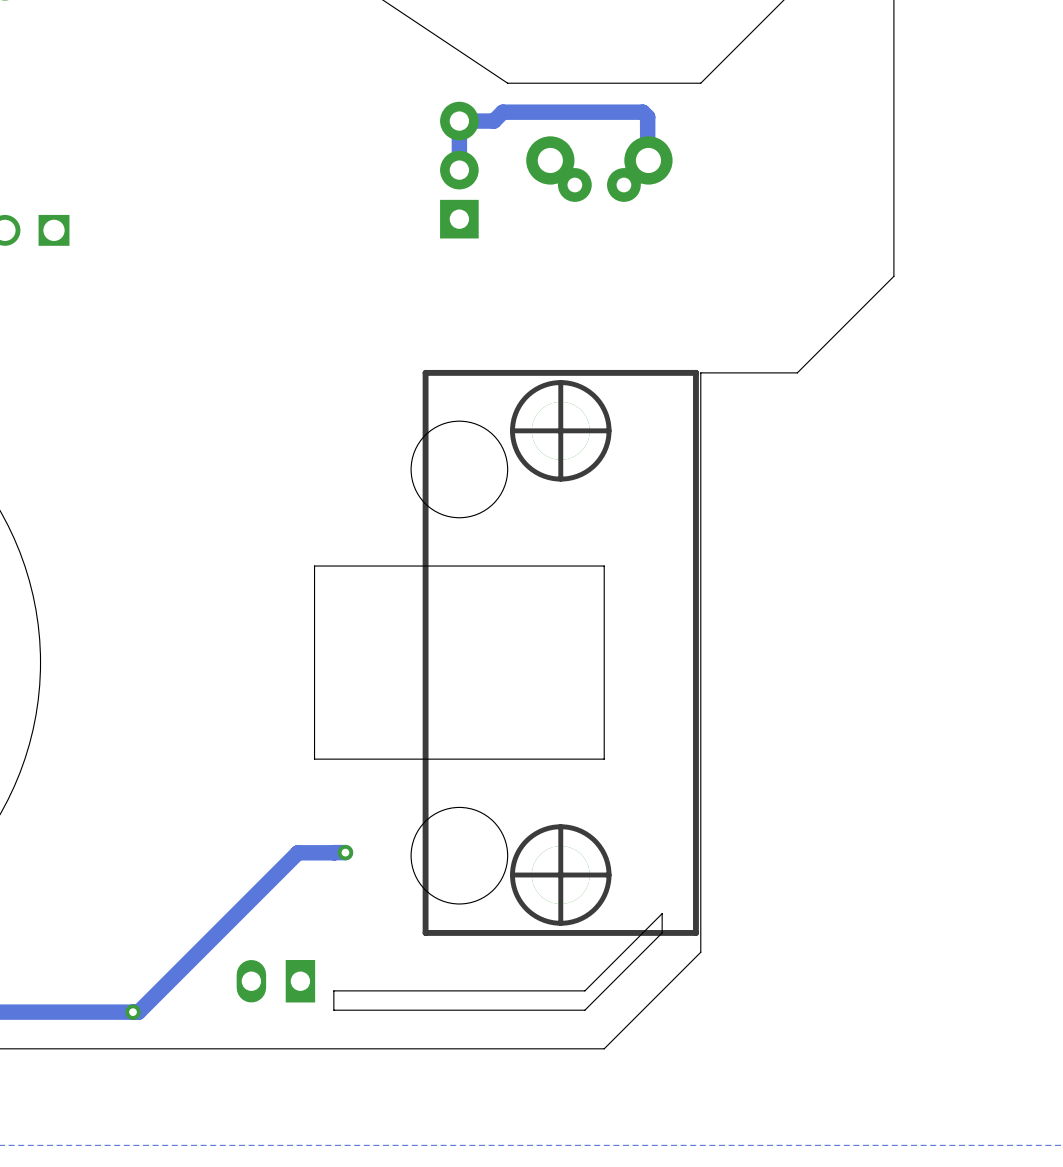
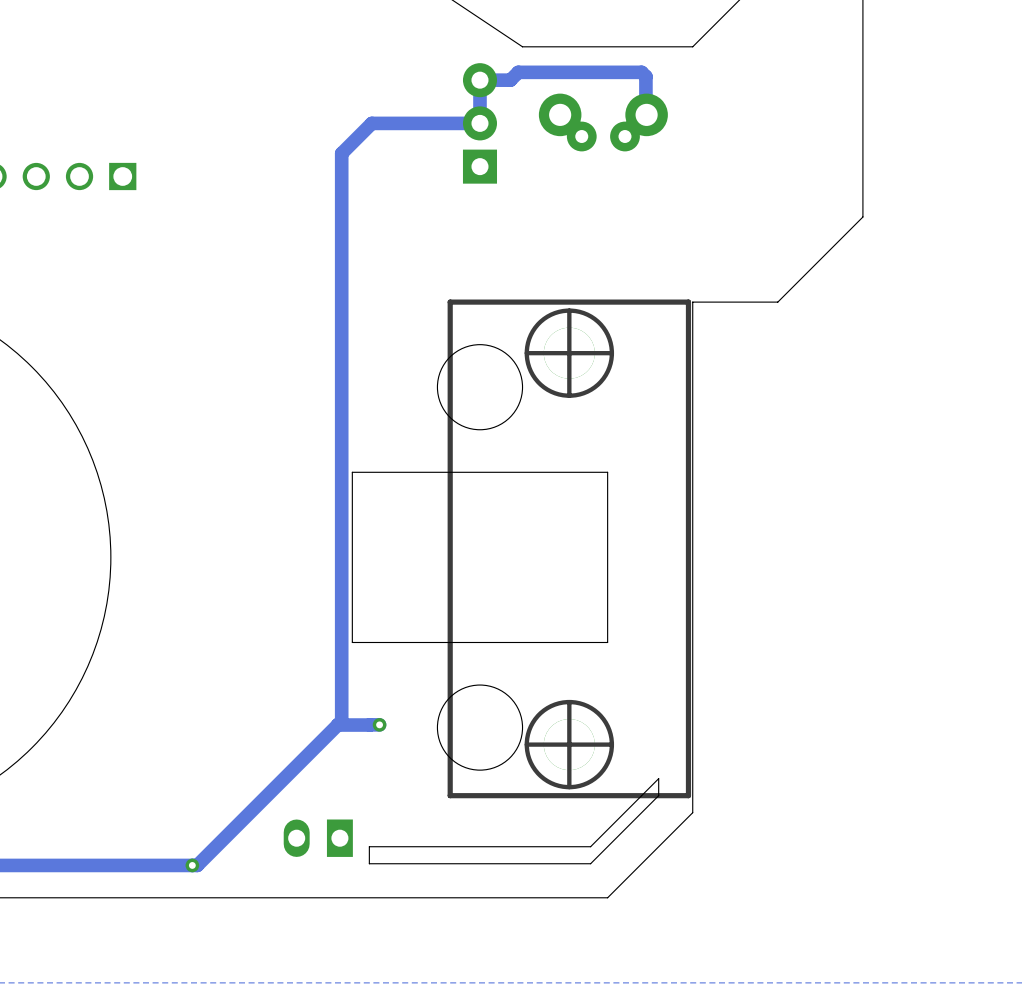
track: none -> (479, 123) (371, 123) (341, 153) (341, 721) (337, 725)

